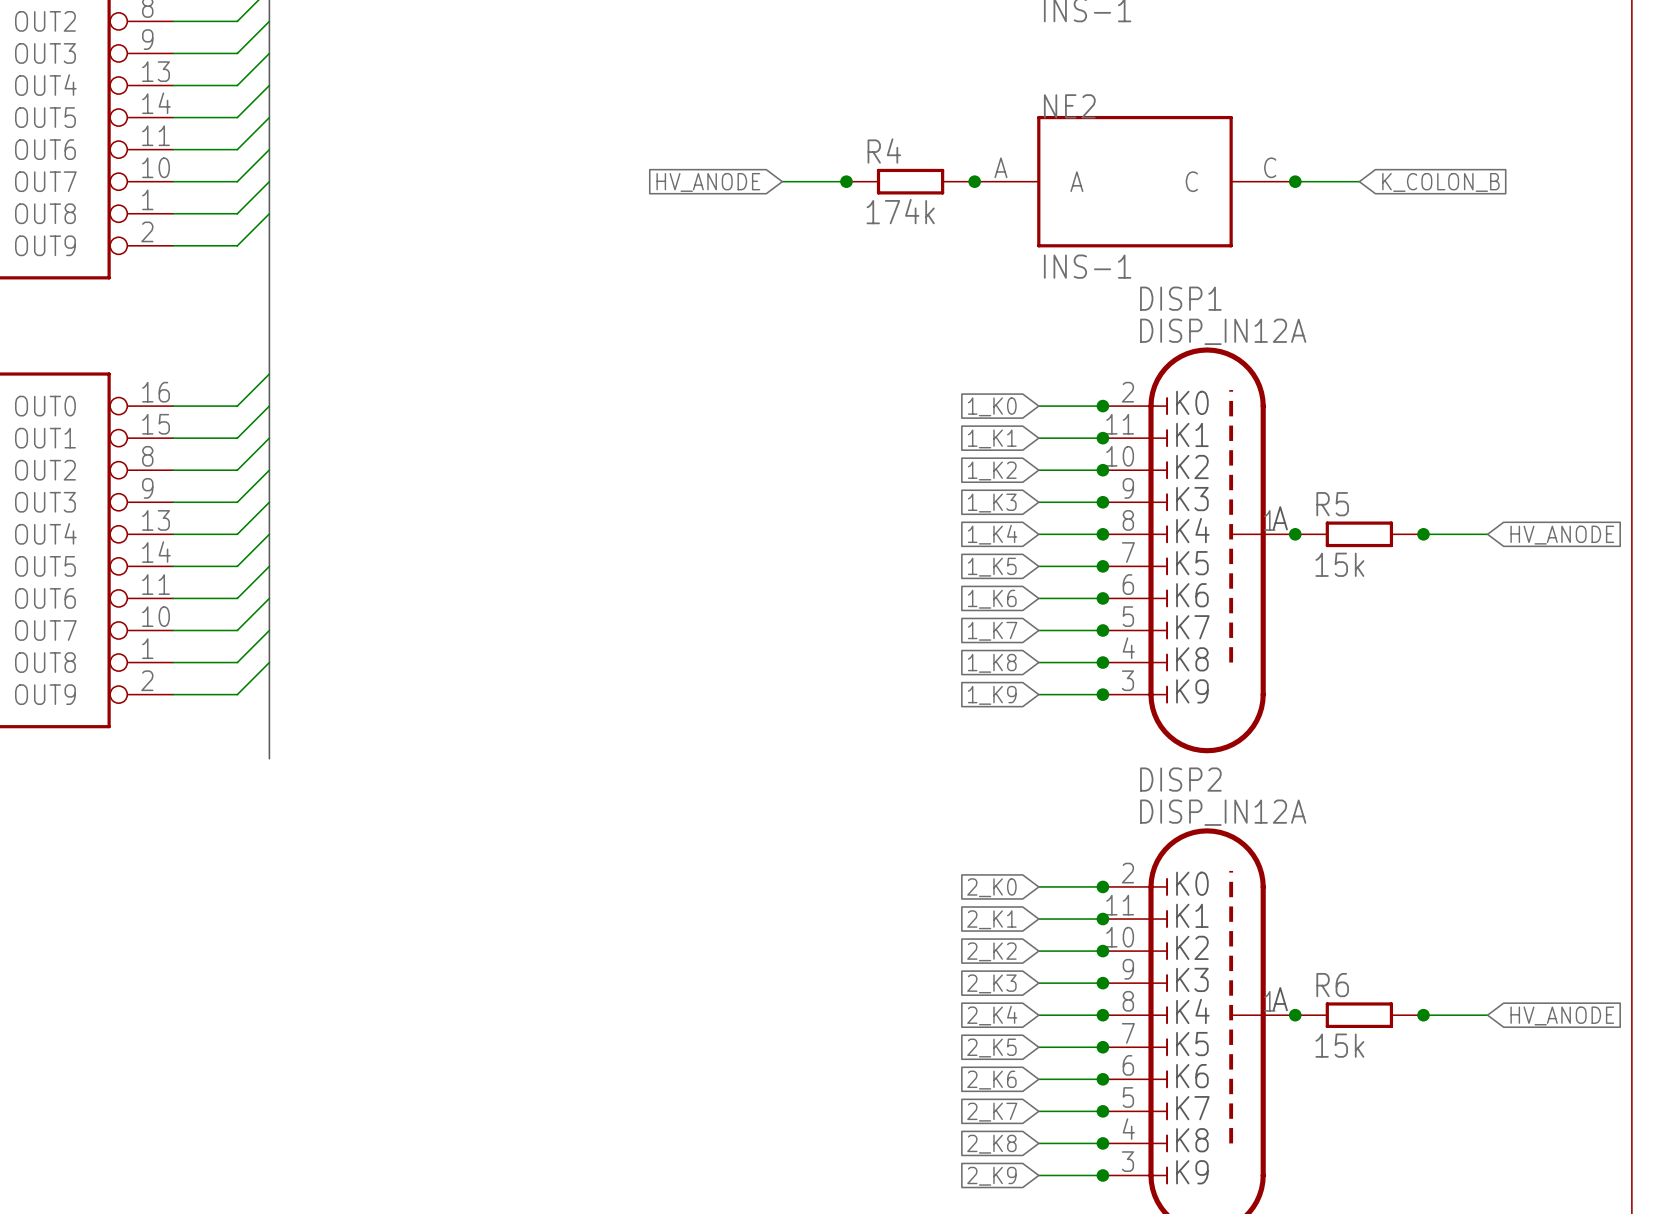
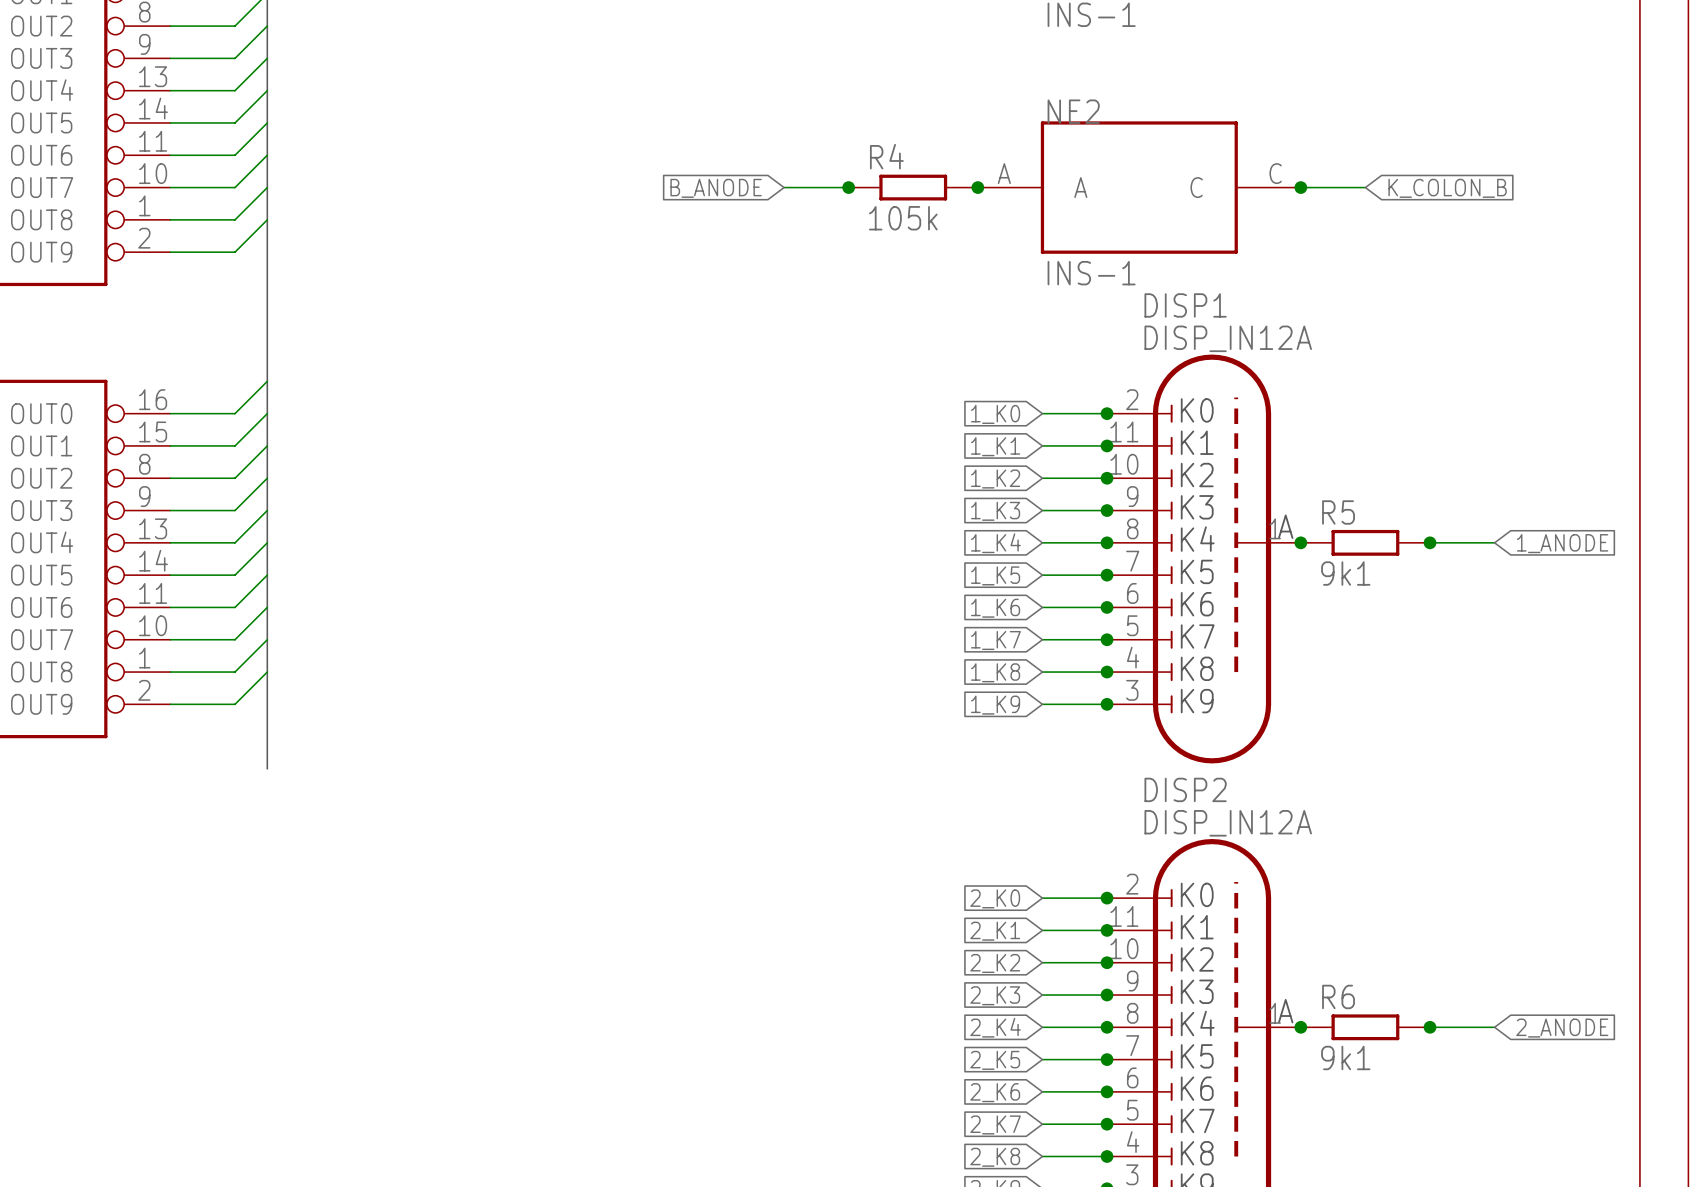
global label: HV_ANODE (708, 182) -> B_ANODE (716, 188)
R4 value: 174k (900, 211) -> 105k (903, 218)
global label: HV_ANODE (1562, 535) -> 1_ANODE (1562, 543)
R5 value: 15k (1339, 564) -> 9k1 (1345, 573)
global label: HV_ANODE (1562, 1015) -> 2_ANODE (1562, 1028)
R6 value: 15k (1339, 1045) -> 9k1 (1345, 1057)

